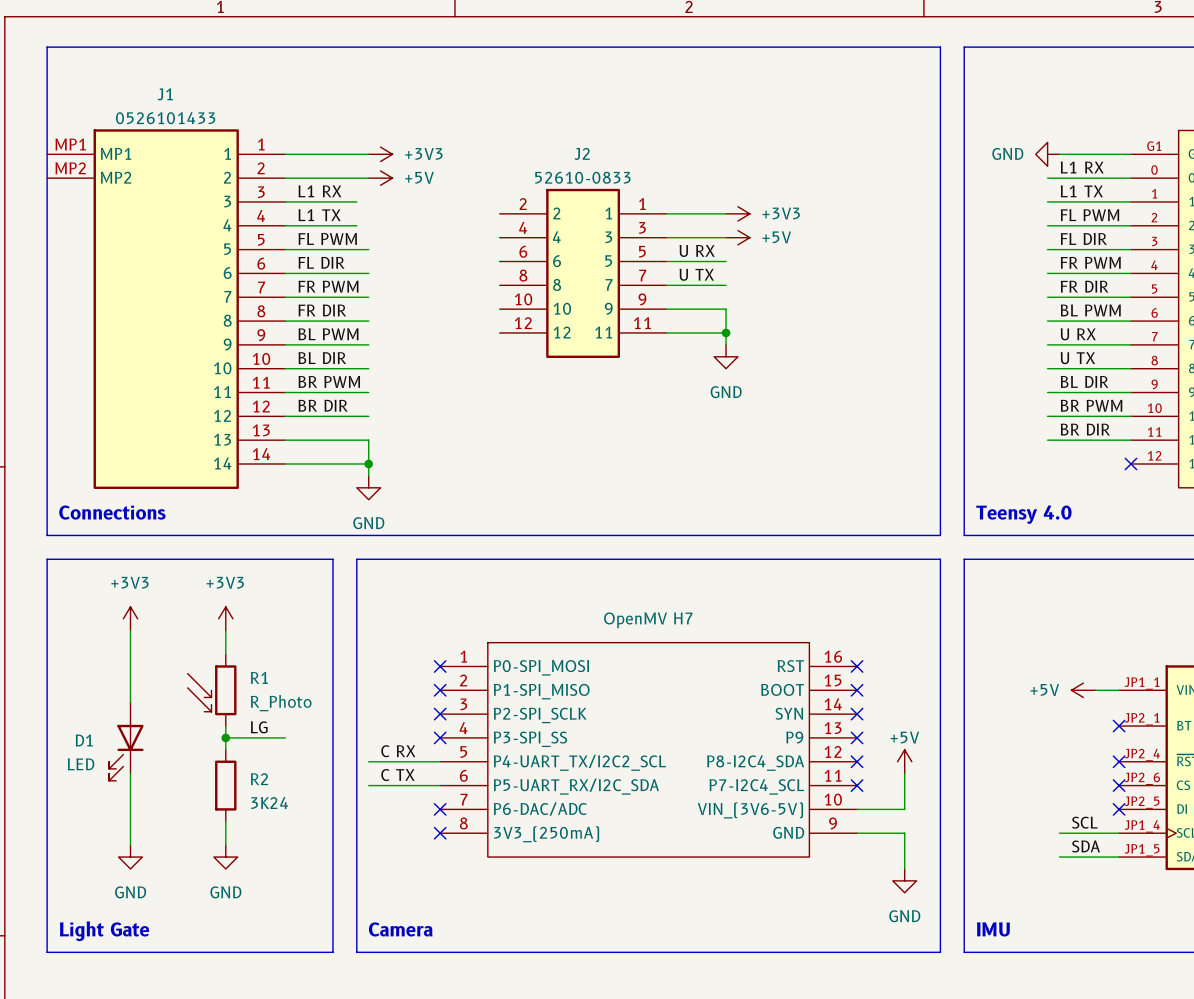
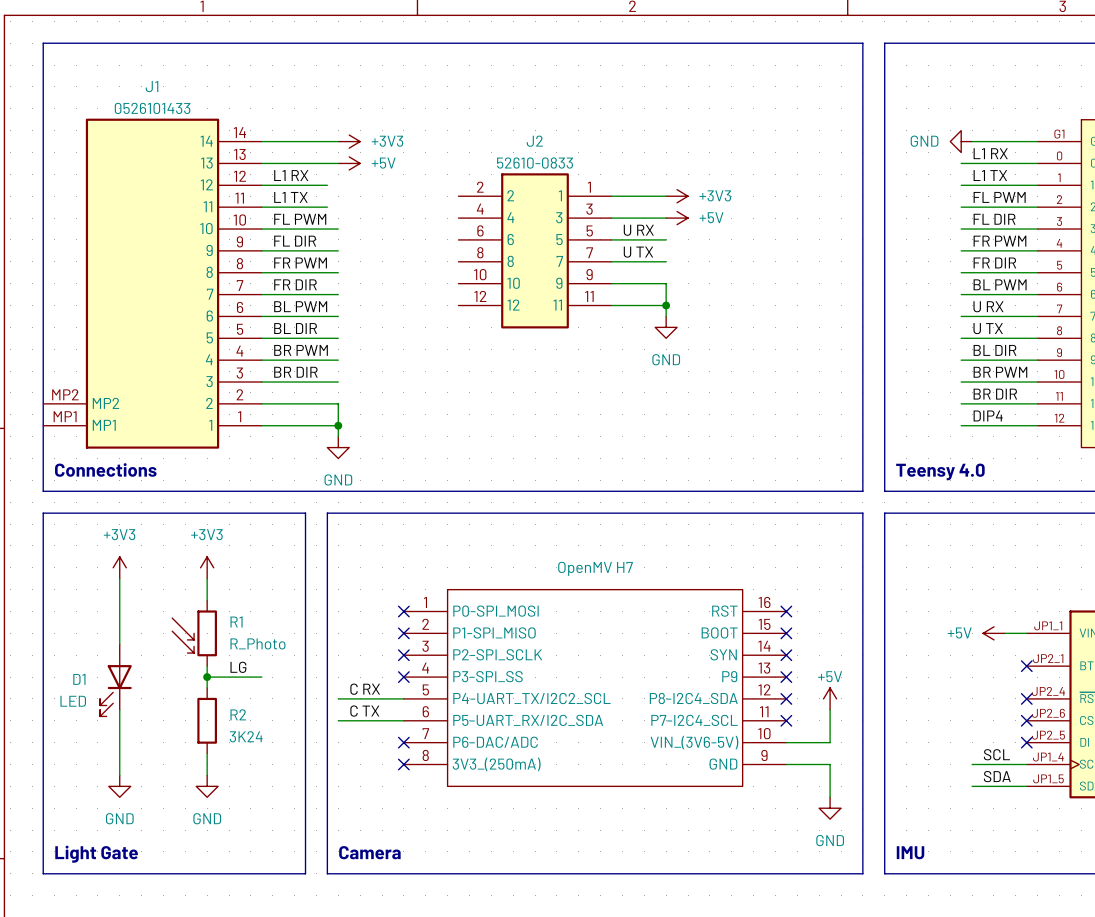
J1 flip: as is (166, 309) -> up-down (152, 283)
label: none -> DIP4 (988, 415)
wire: none -> (961, 425) (1037, 425)
no-connect mark: (1130, 463) -> none

